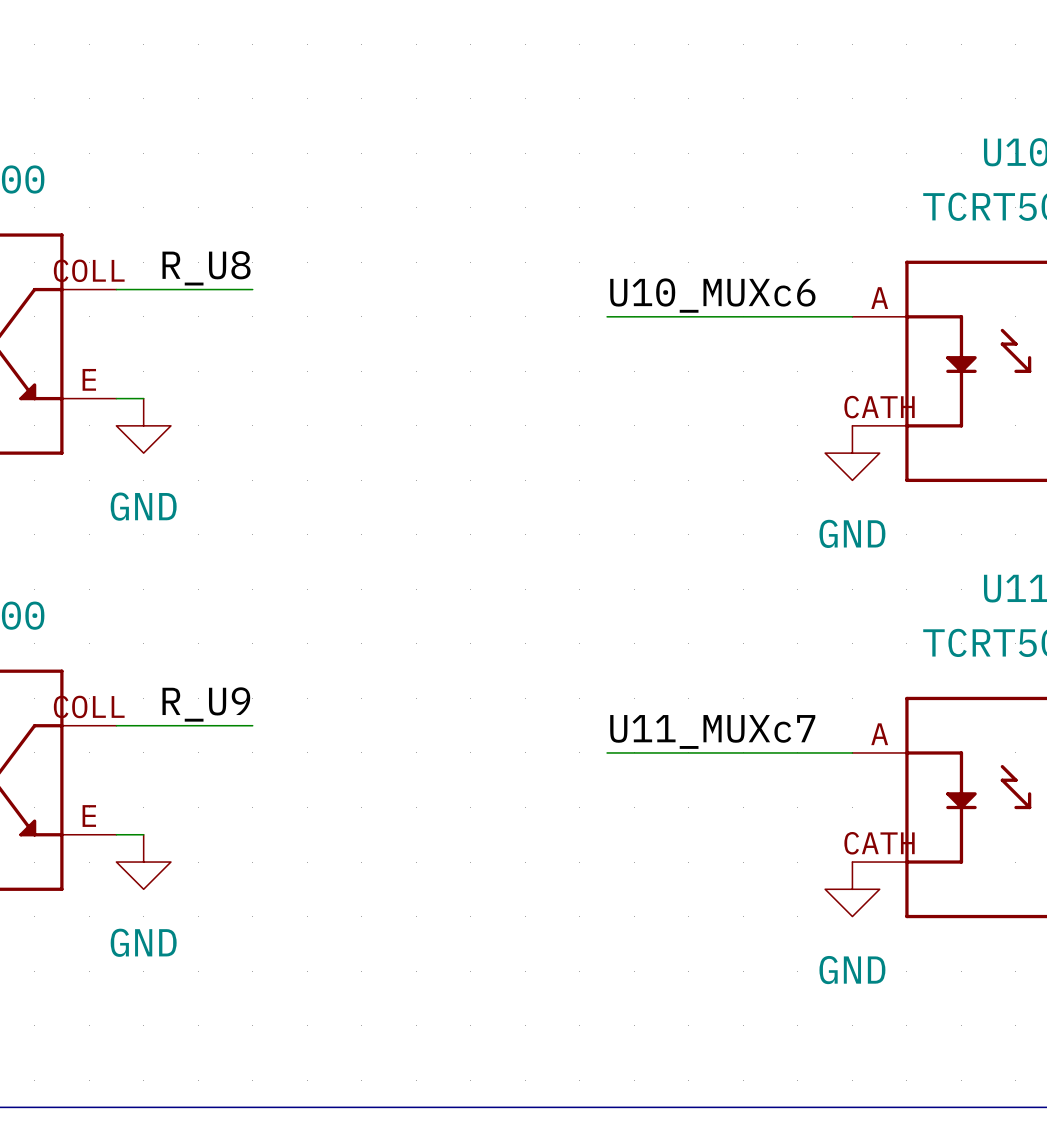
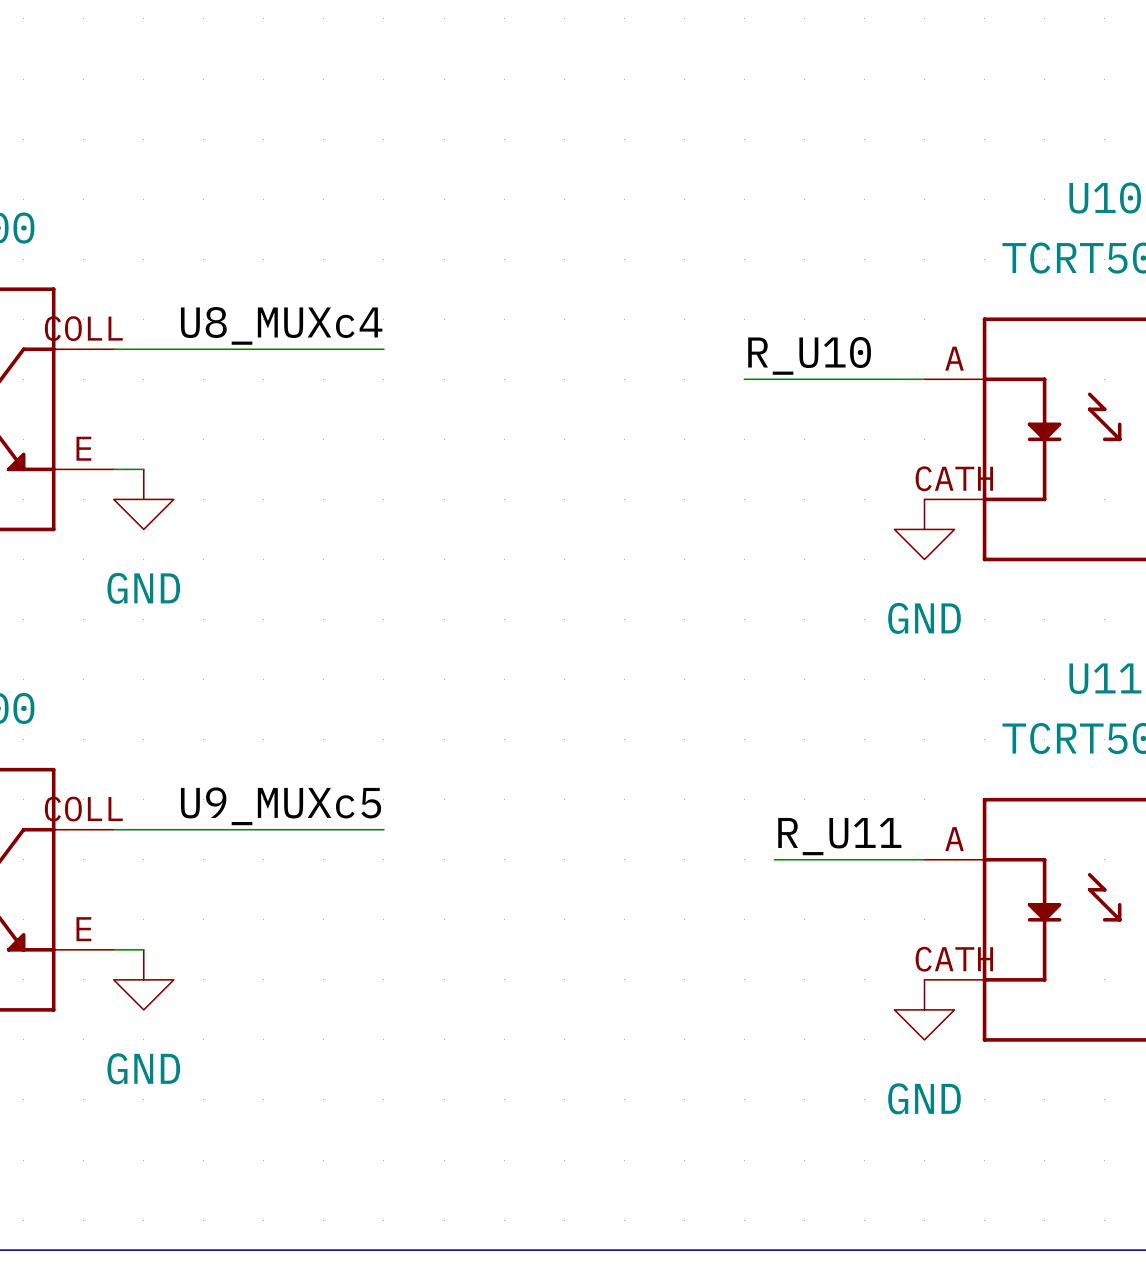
label: R_U8 (206, 268) -> none
label: none -> U8_MUXc4 (281, 325)
wire: none -> (263, 349) (383, 349)
label: U10_MUXc6 (712, 295) -> none
label: none -> R_U10 (809, 355)
wire: (607, 316) (688, 316) -> none
label: R_U9 (206, 704) -> none
label: none -> U9_MUXc5 (281, 806)
label: U11_MUXc7 (712, 731) -> none
label: none -> R_U11 (839, 836)
wire: (607, 752) (716, 752) -> (263, 829) (383, 829)

